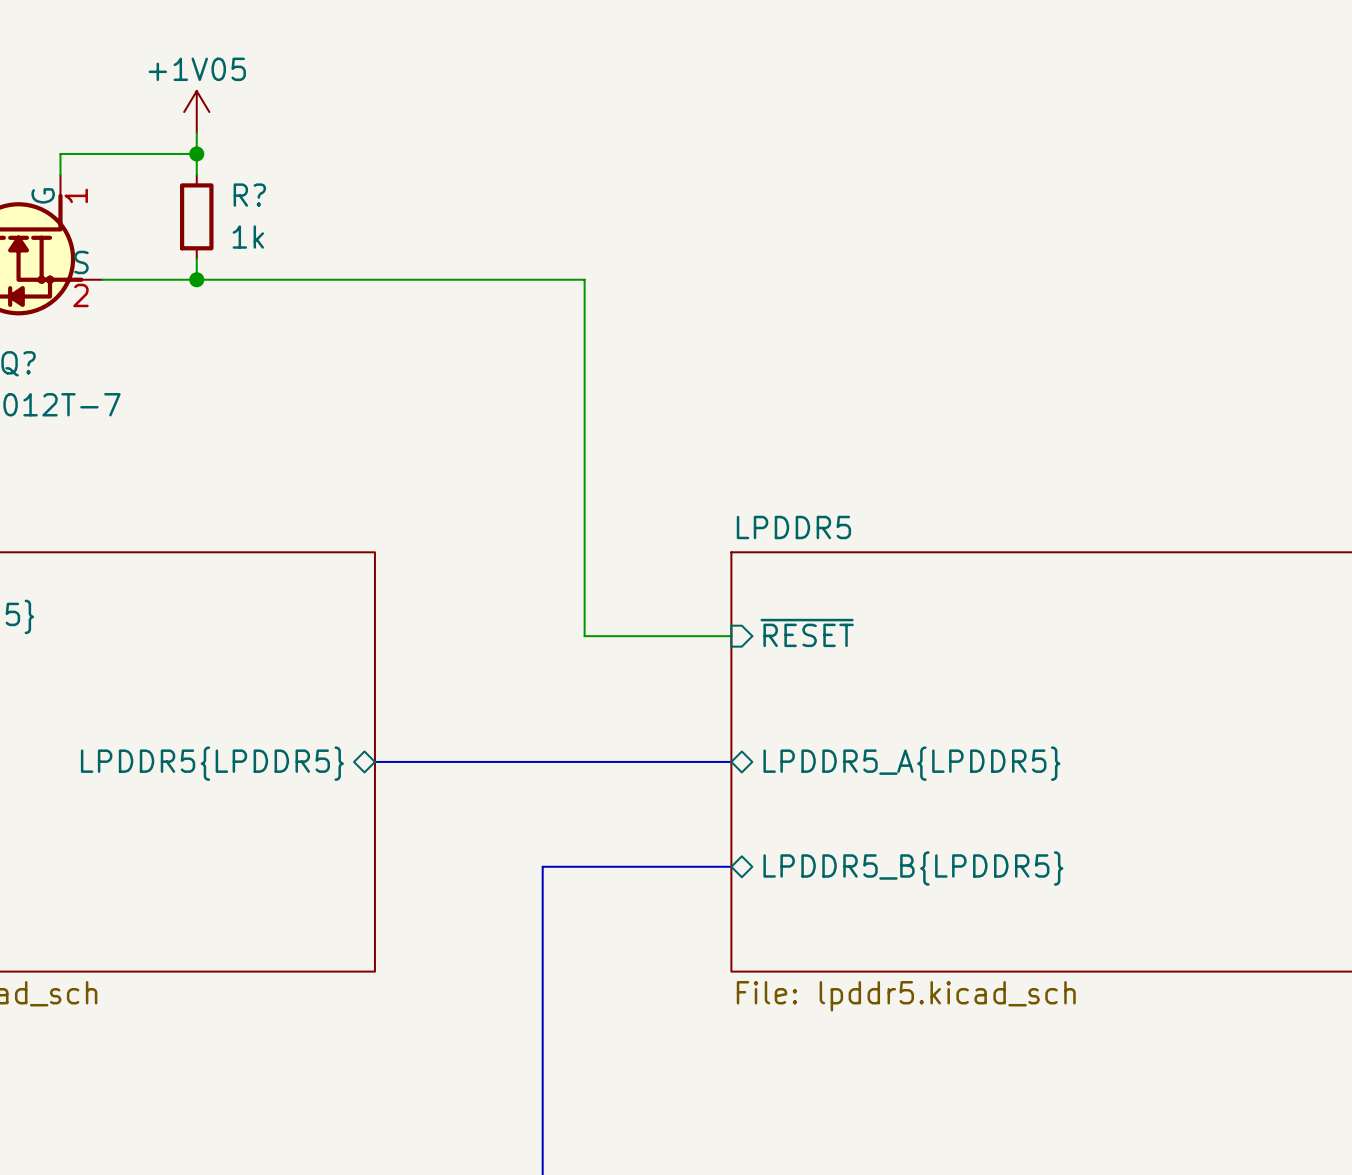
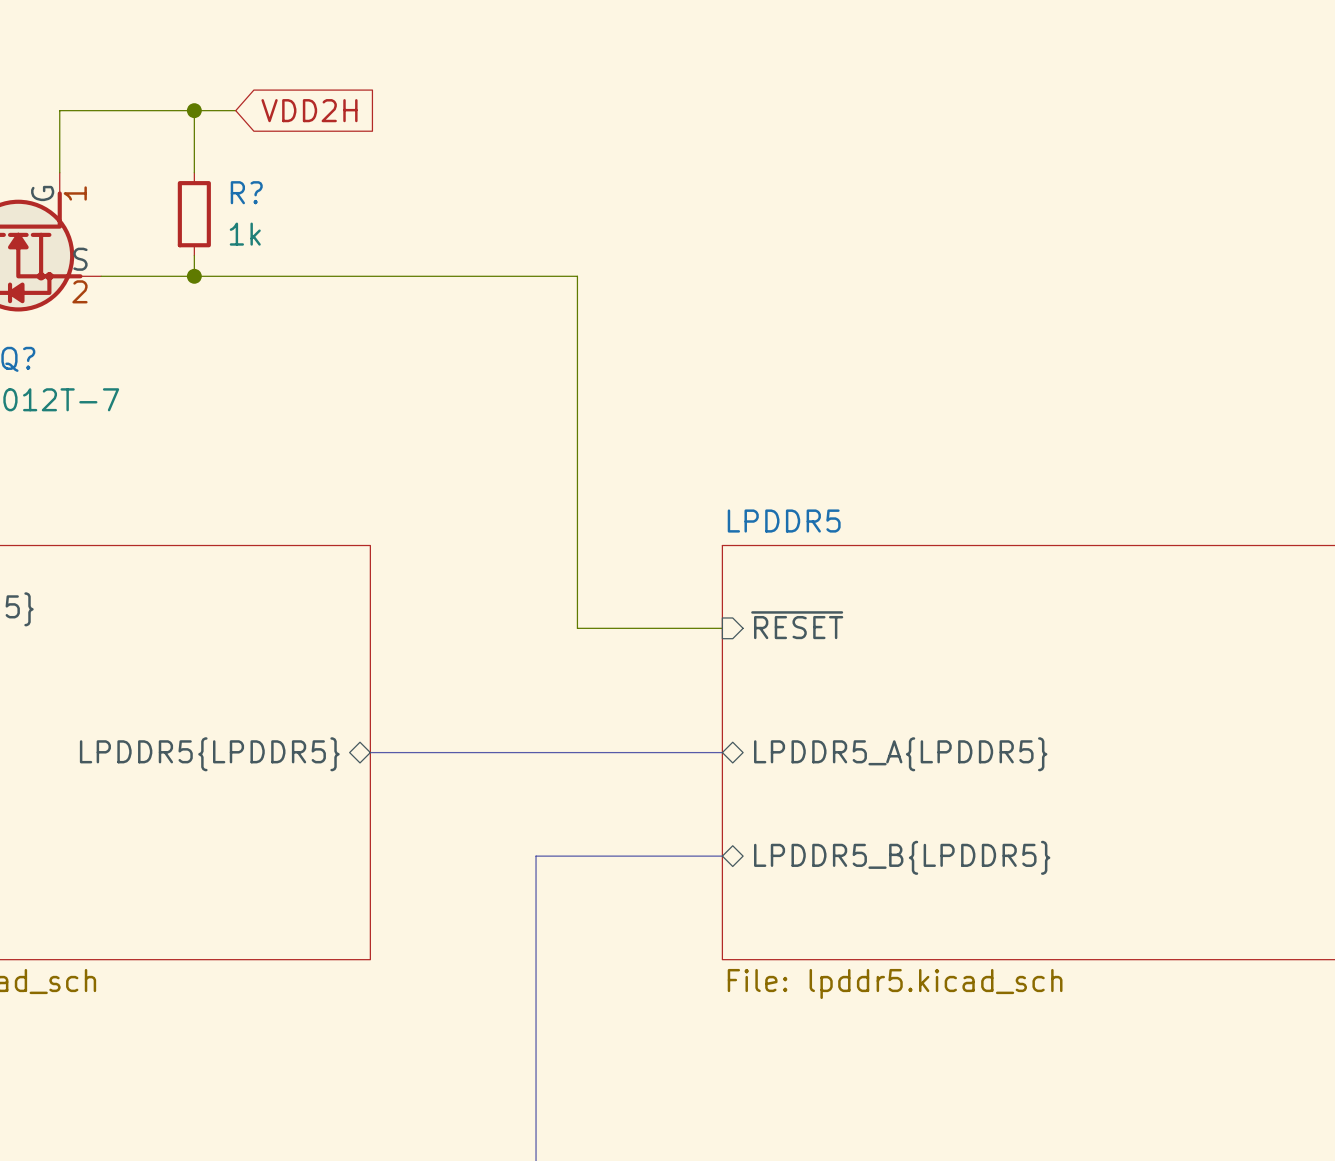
power symbol: +1V05 (196, 112) -> none
global label: none -> VDD2H (309, 110)
wire: (60, 153) (196, 153) -> (59, 152) (59, 110) (235, 110)
junction position: (196, 153) -> (194, 110)

